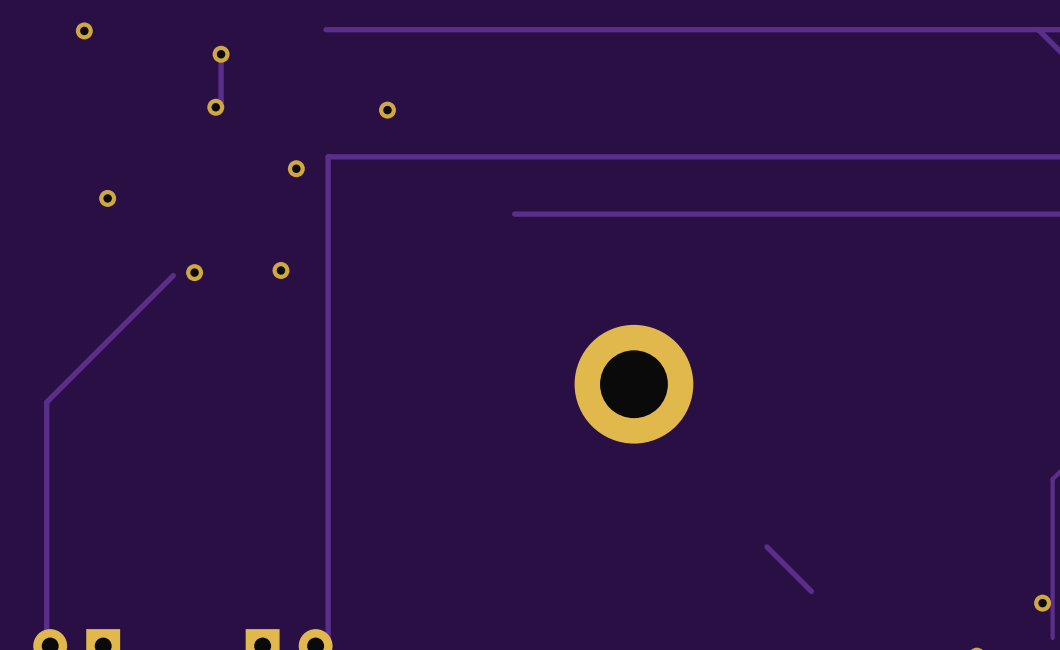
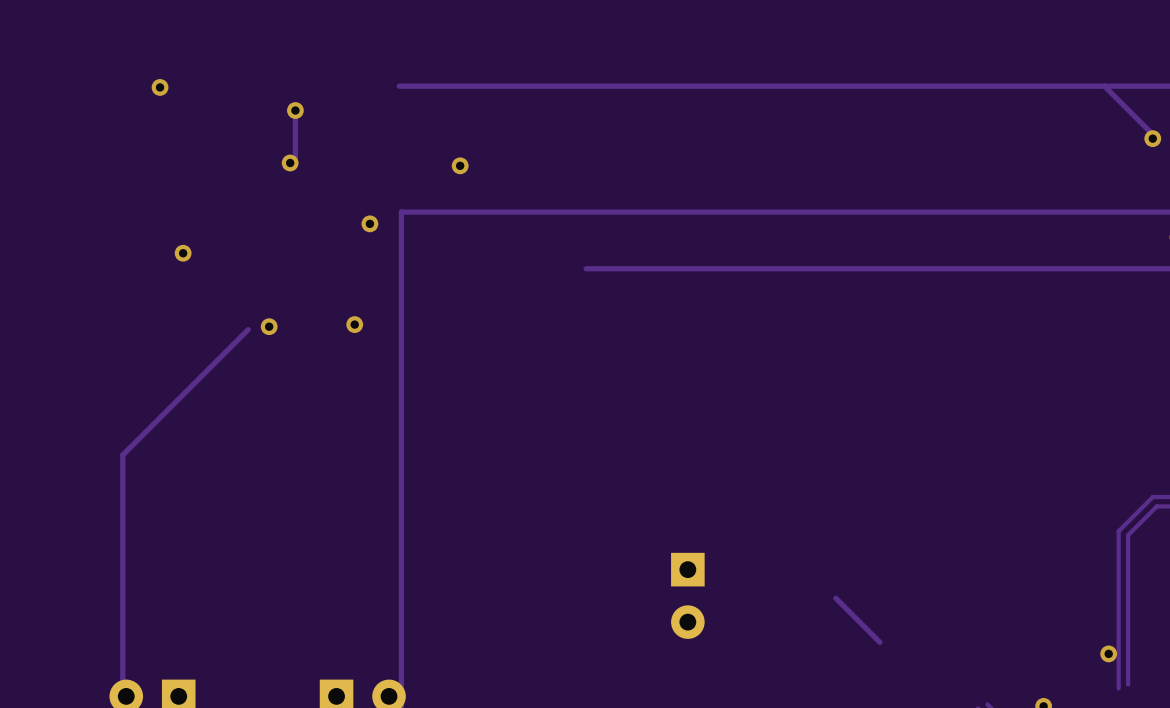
part: (633, 384) -> none
part: none -> (687, 595)

